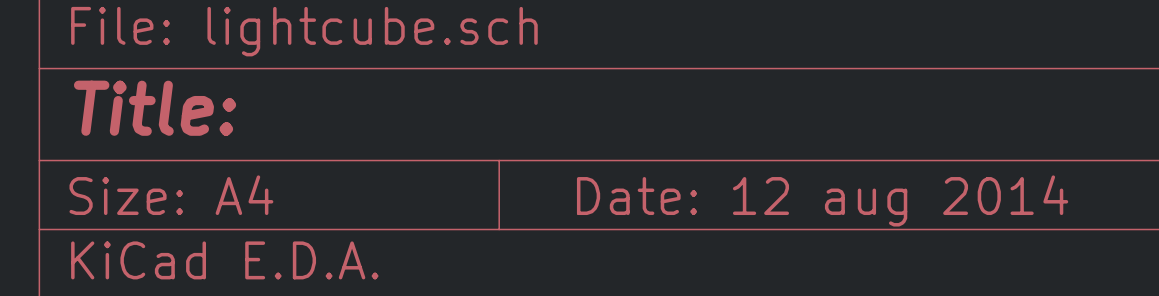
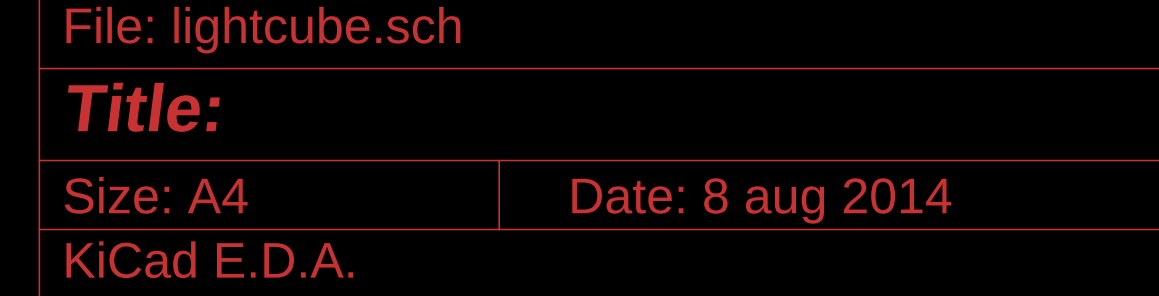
title block: Date: 12 aug 2014 (822, 200) -> Date: 8 aug 2014 (761, 200)

